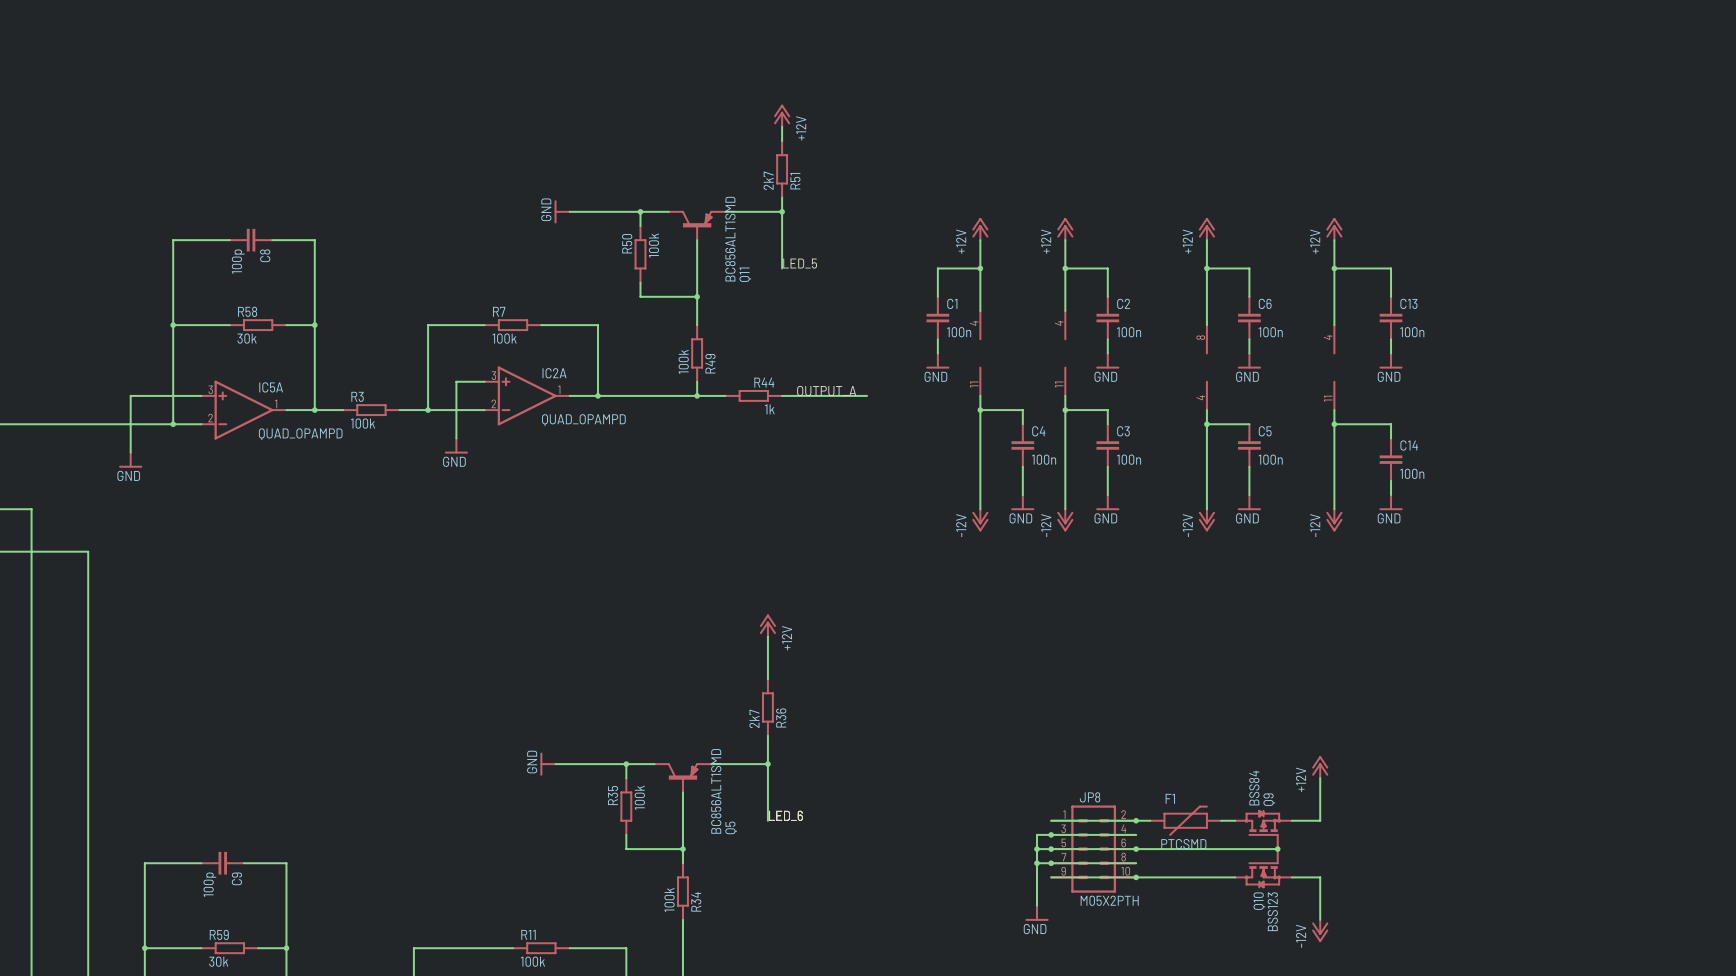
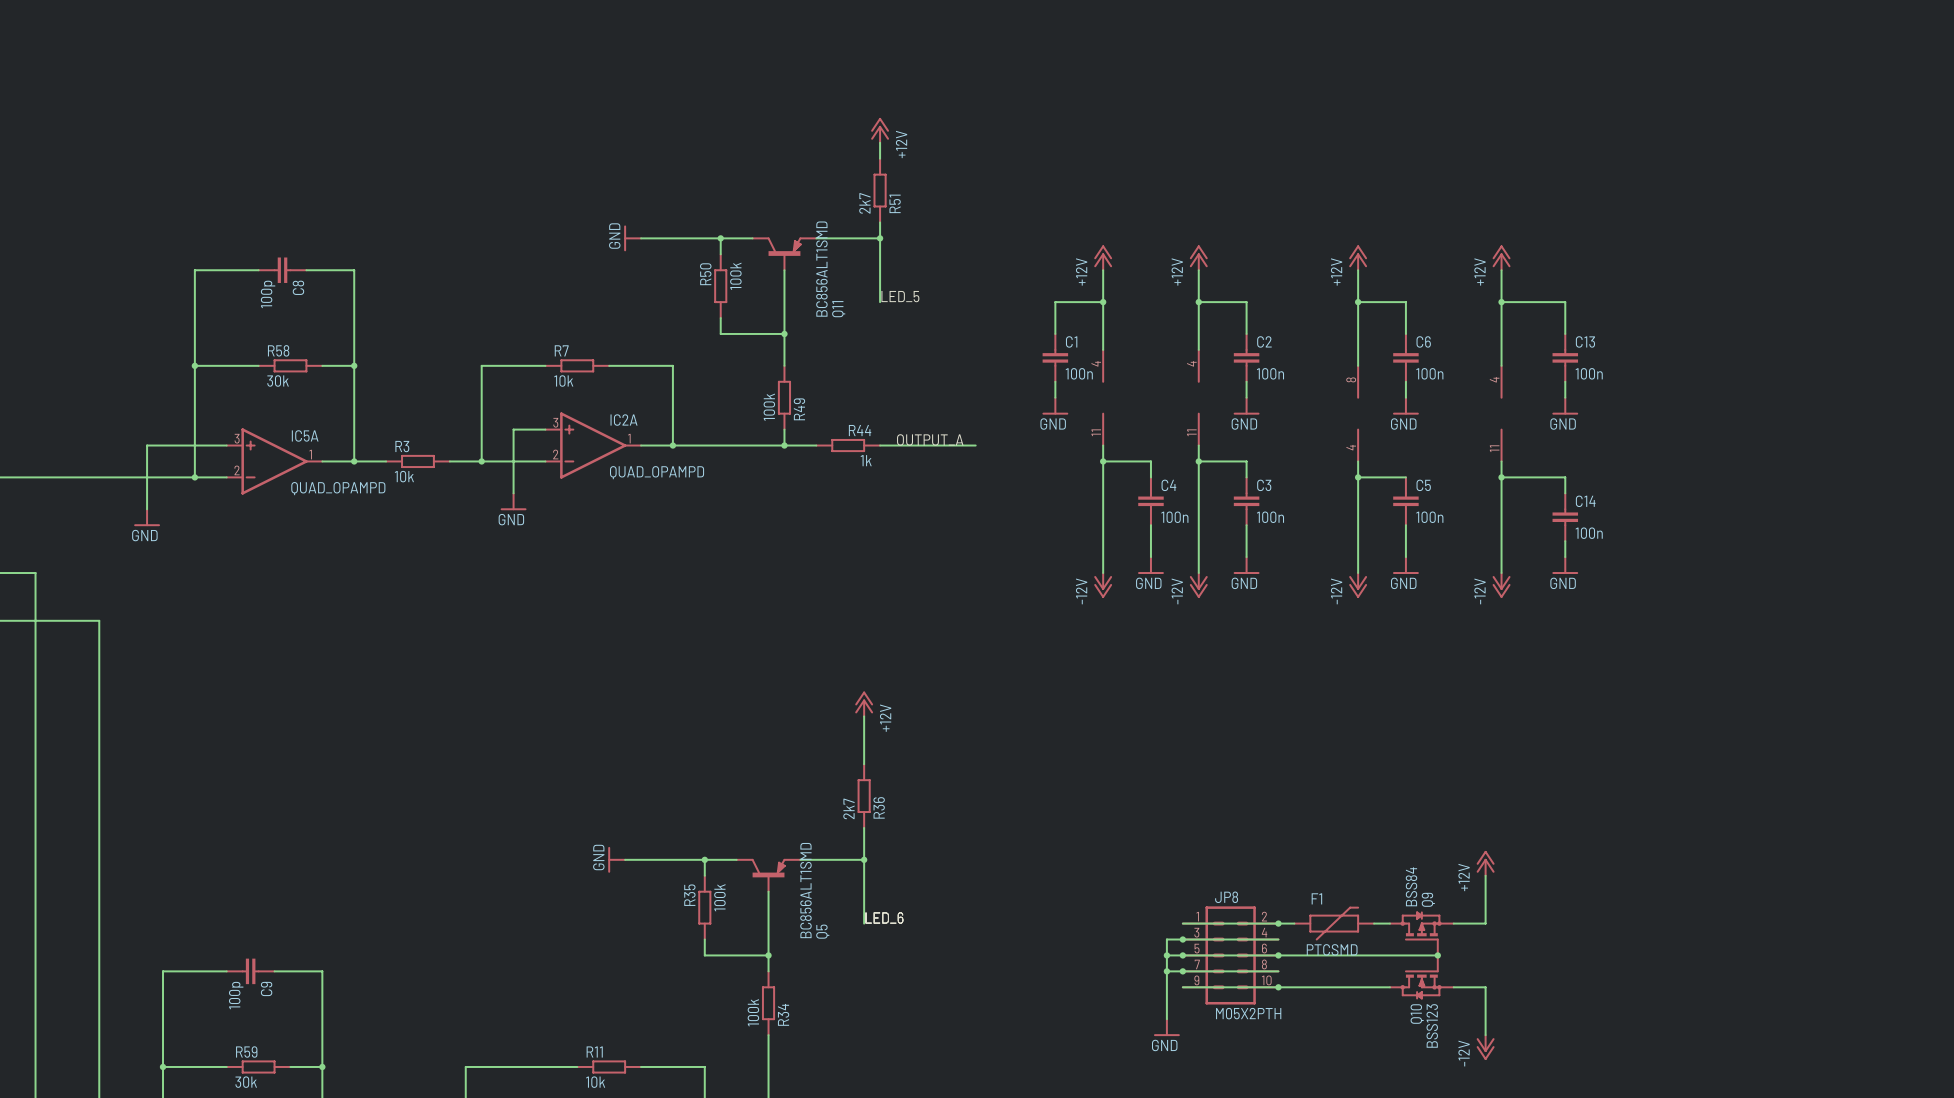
R7 value: 100k (504, 338) -> 10k (563, 380)
R3 value: 100k (362, 423) -> 10k (404, 476)
R11 value: 100k (532, 961) -> 10k (595, 1082)

